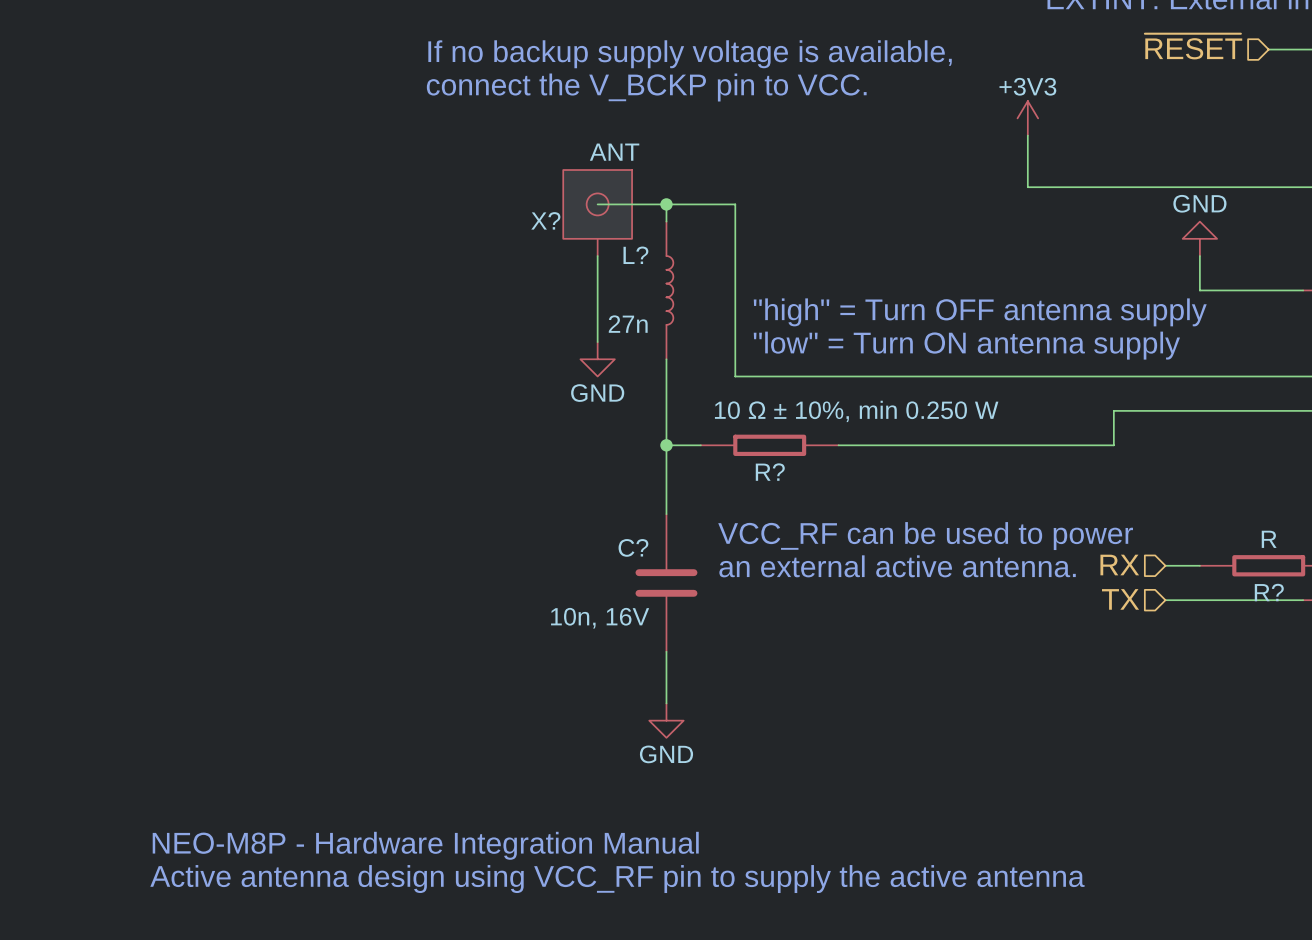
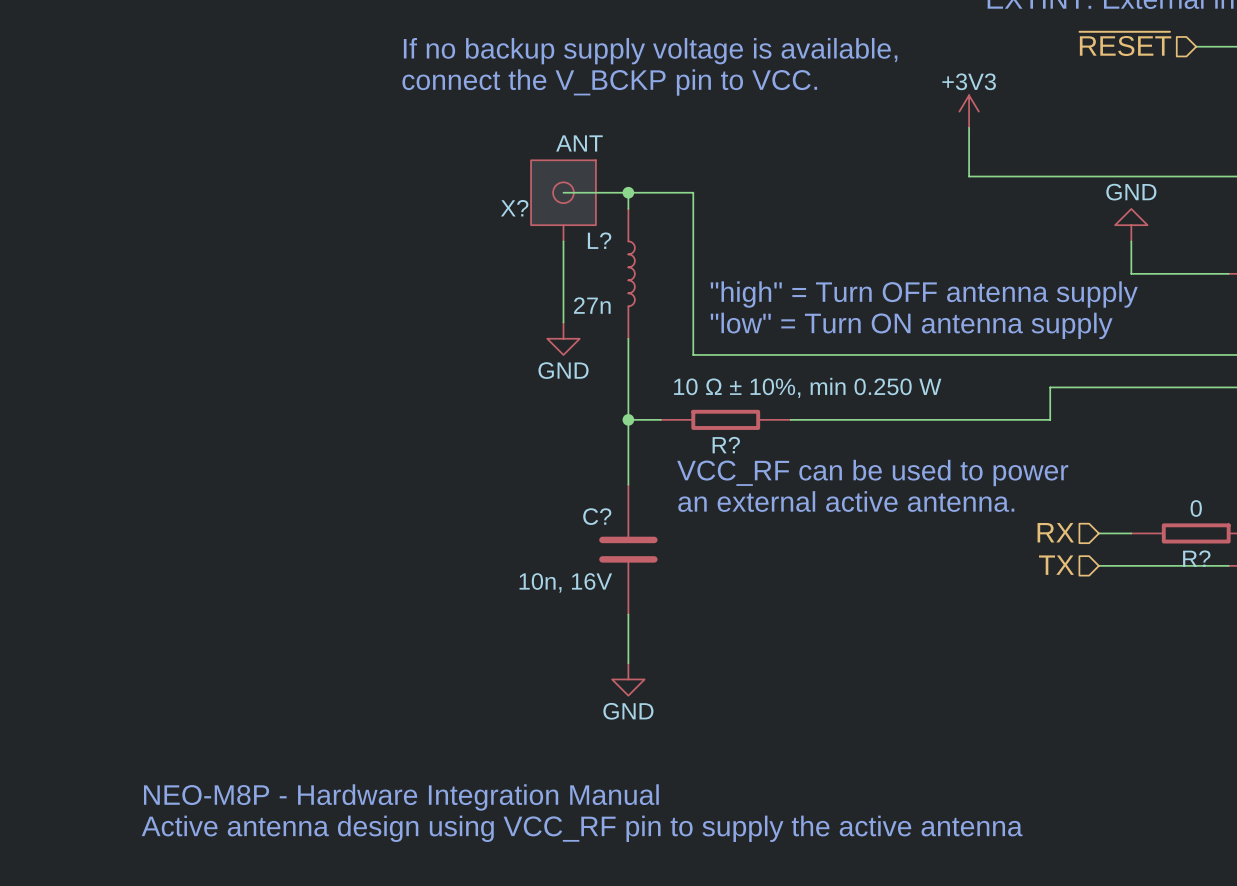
text: none -> VCC_RF can be used to power (872, 472)
text: VCC_RF can be used to power (925, 536) -> an external active antenna. (846, 501)
R? value: R (1269, 539) -> 0 (1196, 508)
text: an external active antenna. (897, 566) -> none

